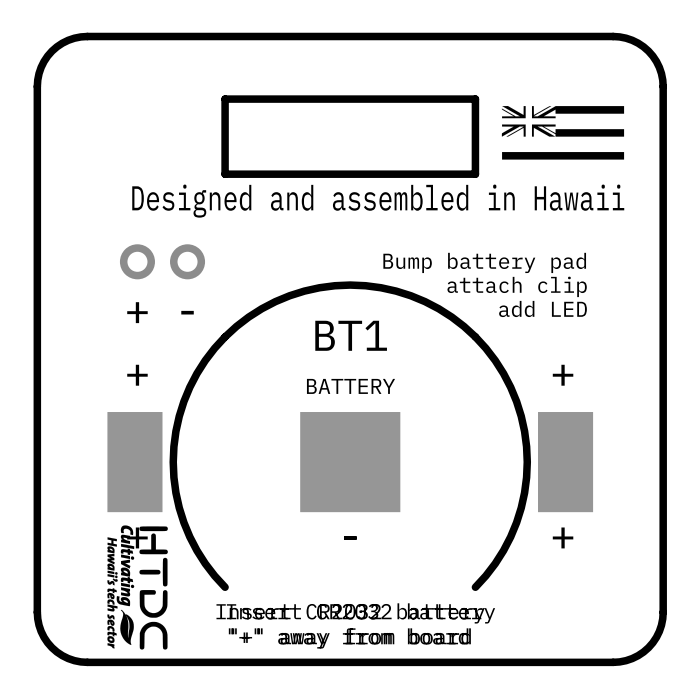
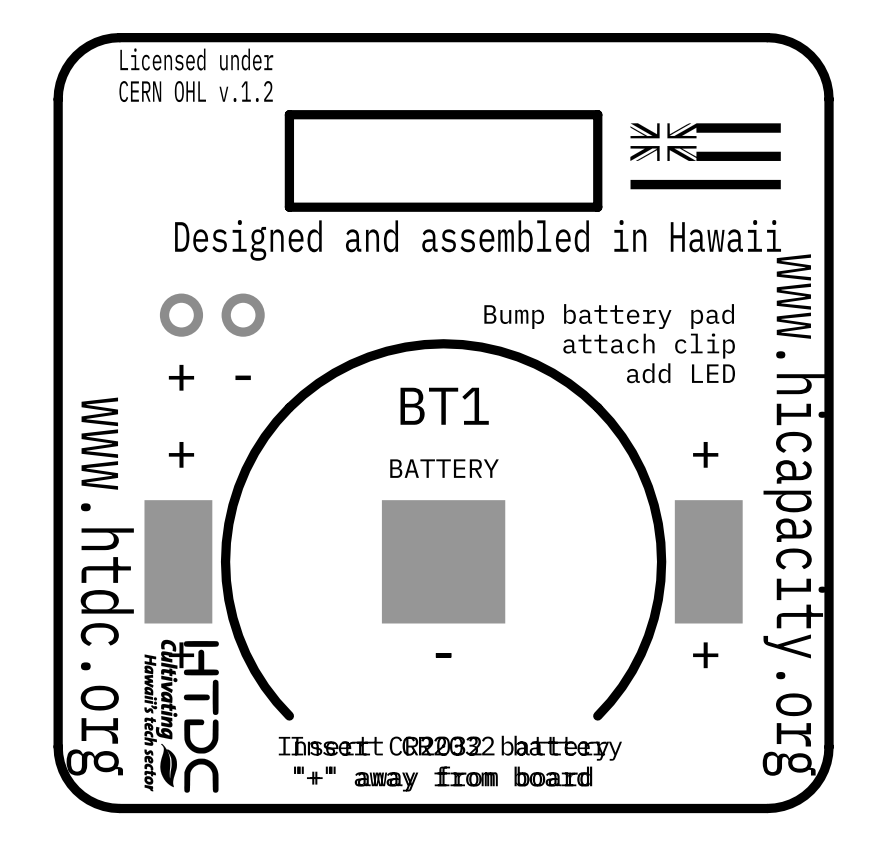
text: none -> Licensed under (196, 59)
text: none -> CERN OHL v.1.2 (196, 91)
text: none -> www.hicapacity.org (794, 515)
text: none -> www.htdc.org (100, 586)

